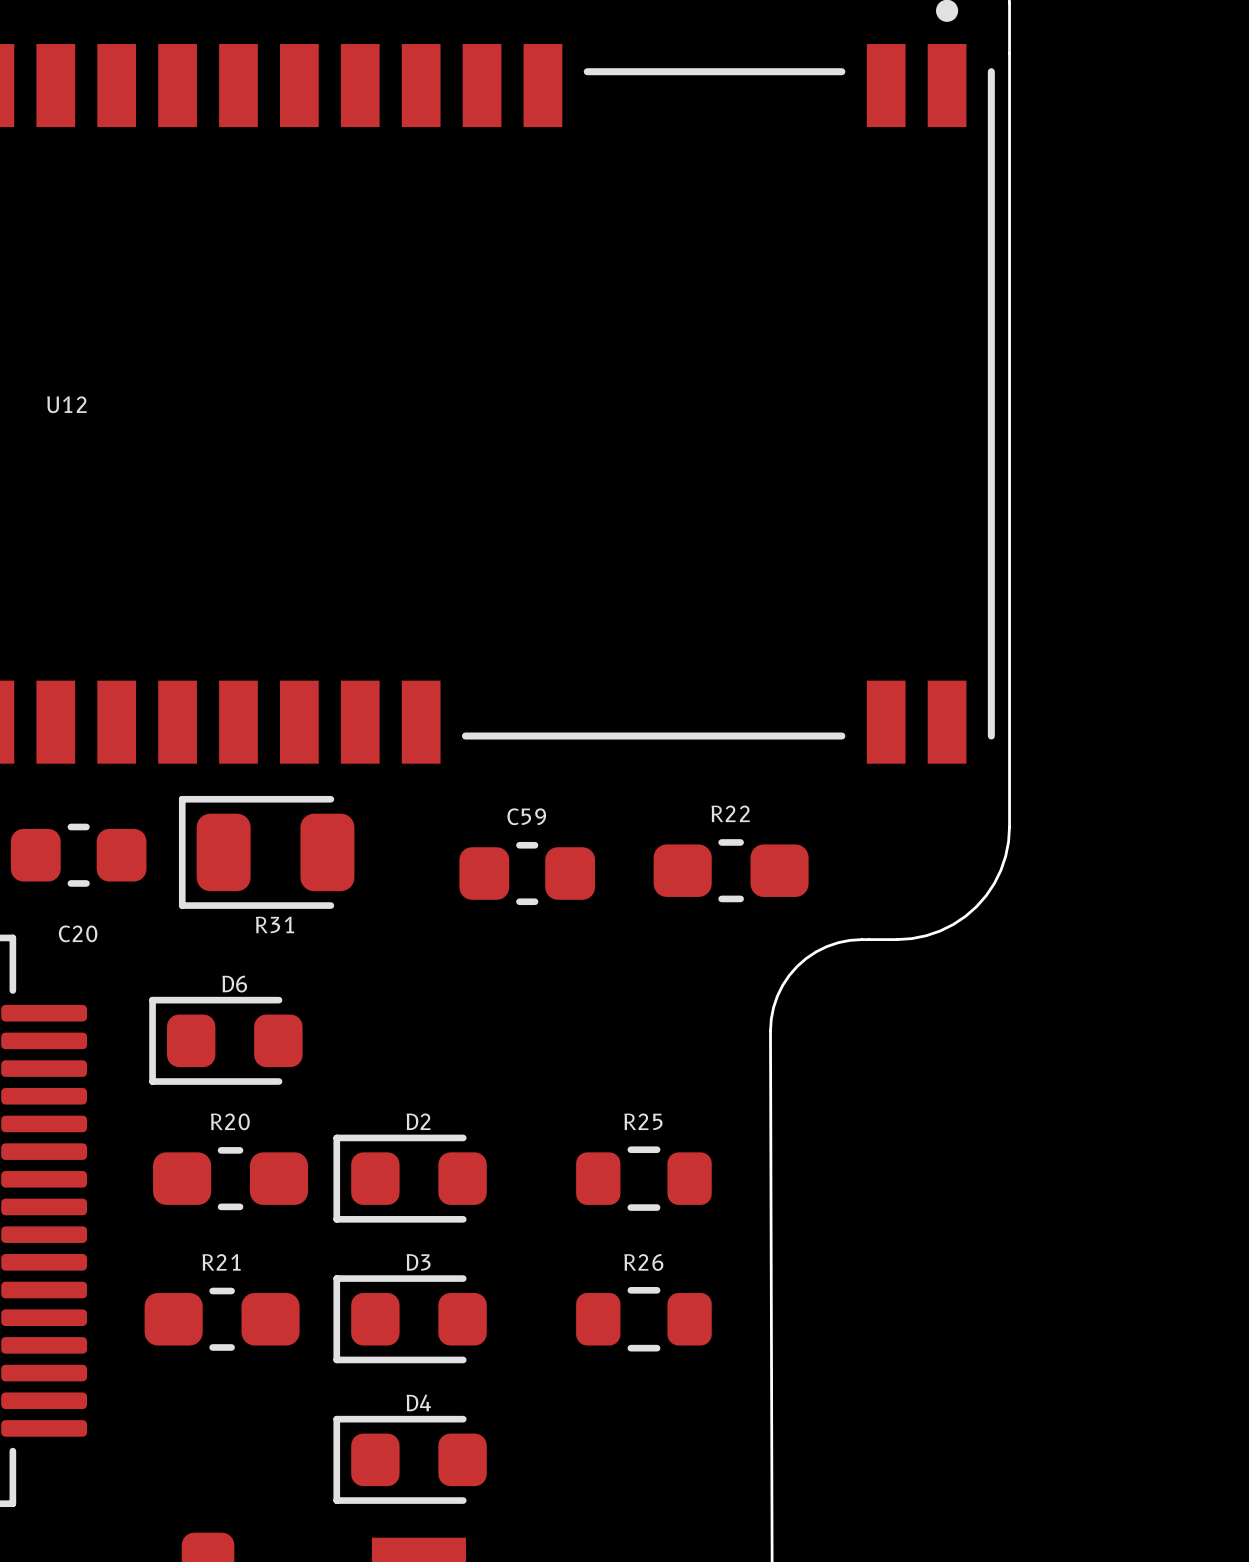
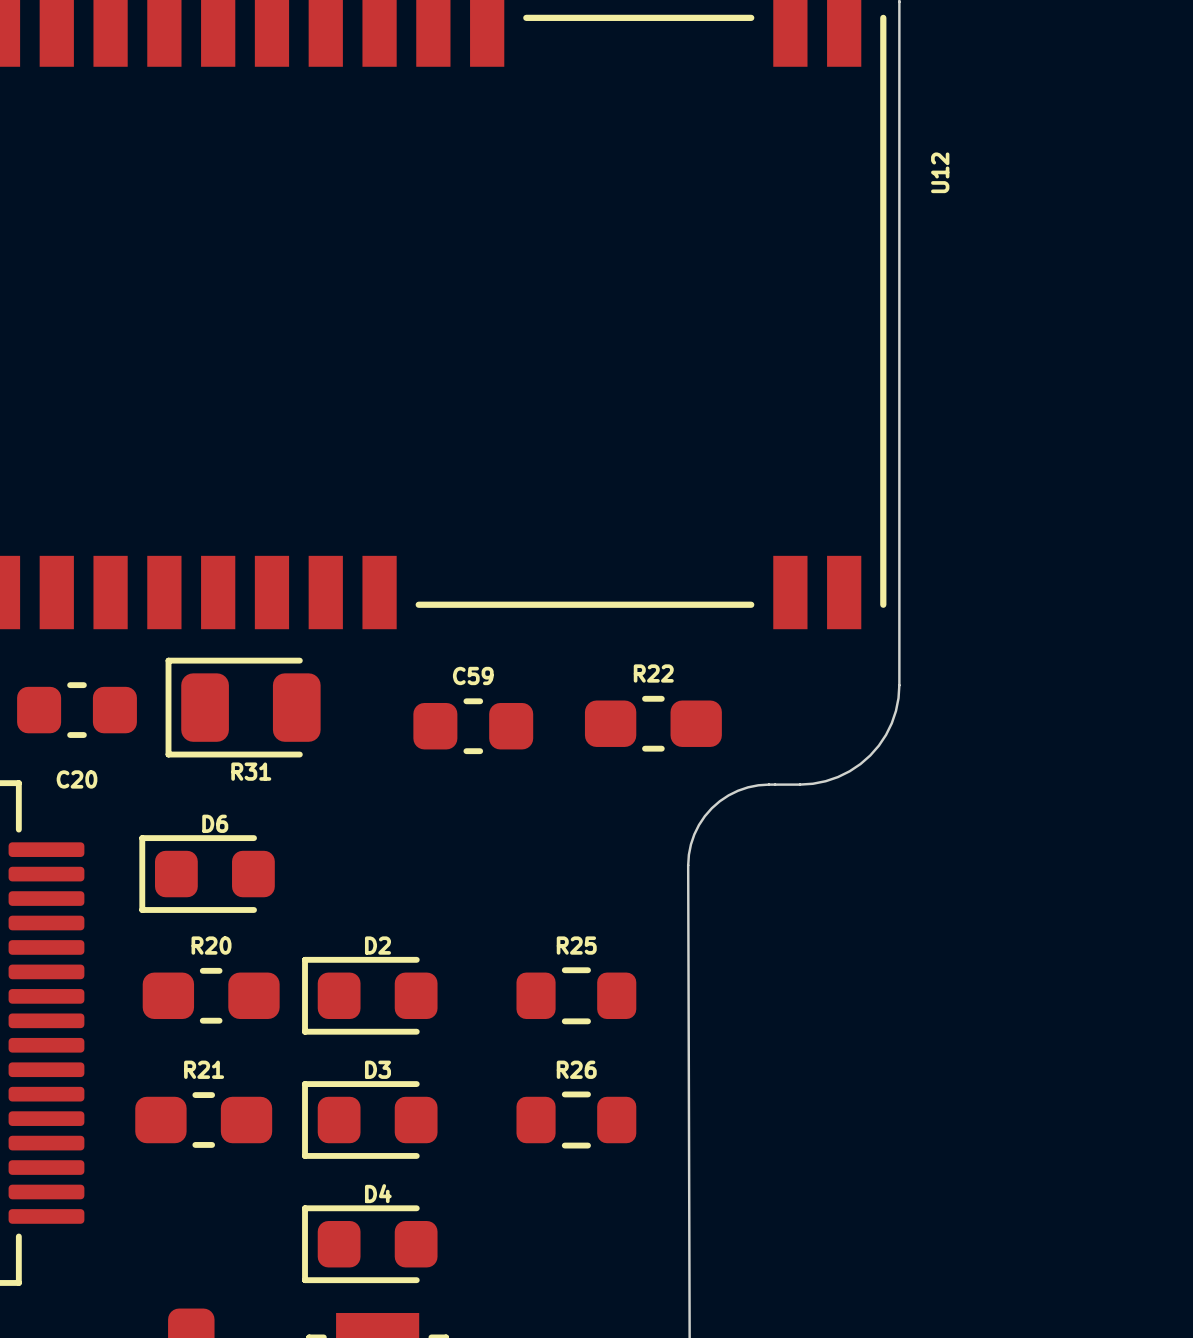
U12 name rotation: 0° (66, 404) -> 90° counterclockwise (940, 172)
U12 name position: U12 (66, 404) -> U12 (940, 172)

